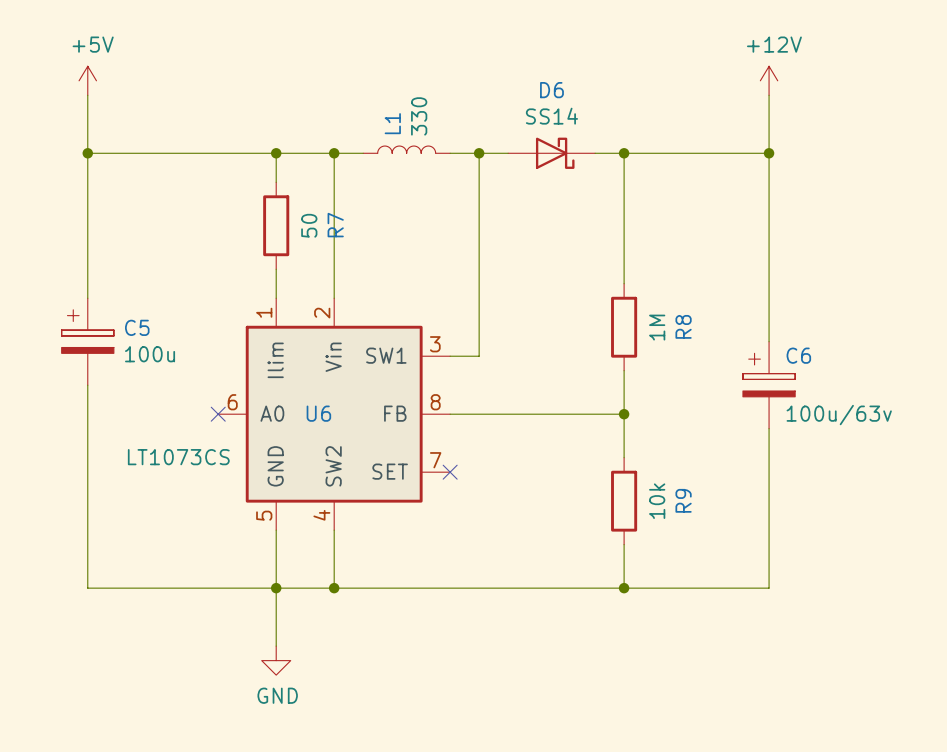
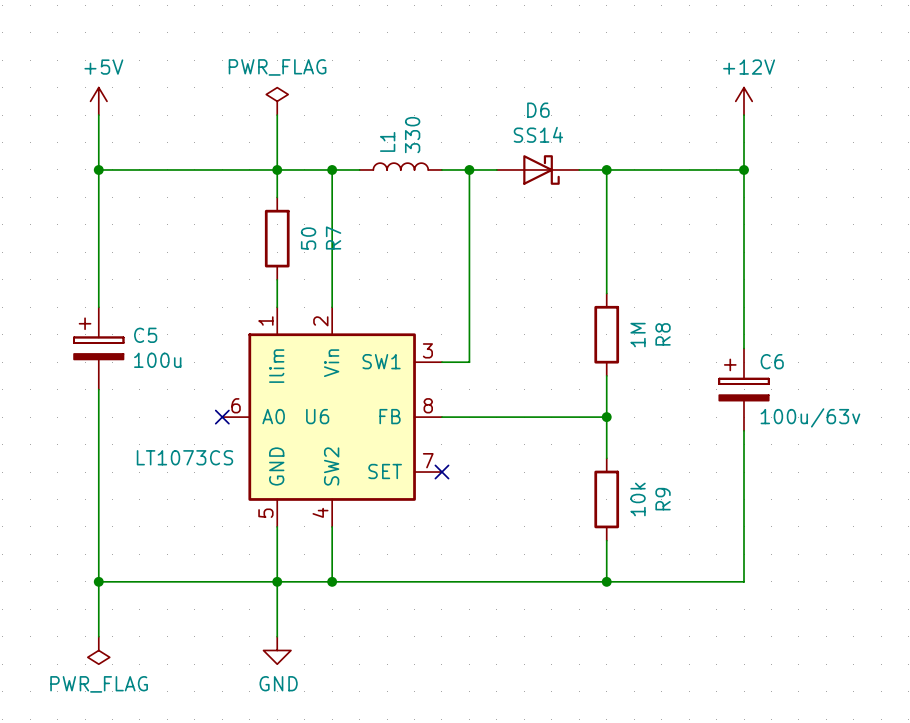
power symbol: none -> PWR_FLAG (277, 101)
wire: none -> (277, 115) (277, 169)
wire: none -> (98, 581) (98, 636)
junction: none -> (98, 581)
power symbol: none -> PWR_FLAG (98, 650)

